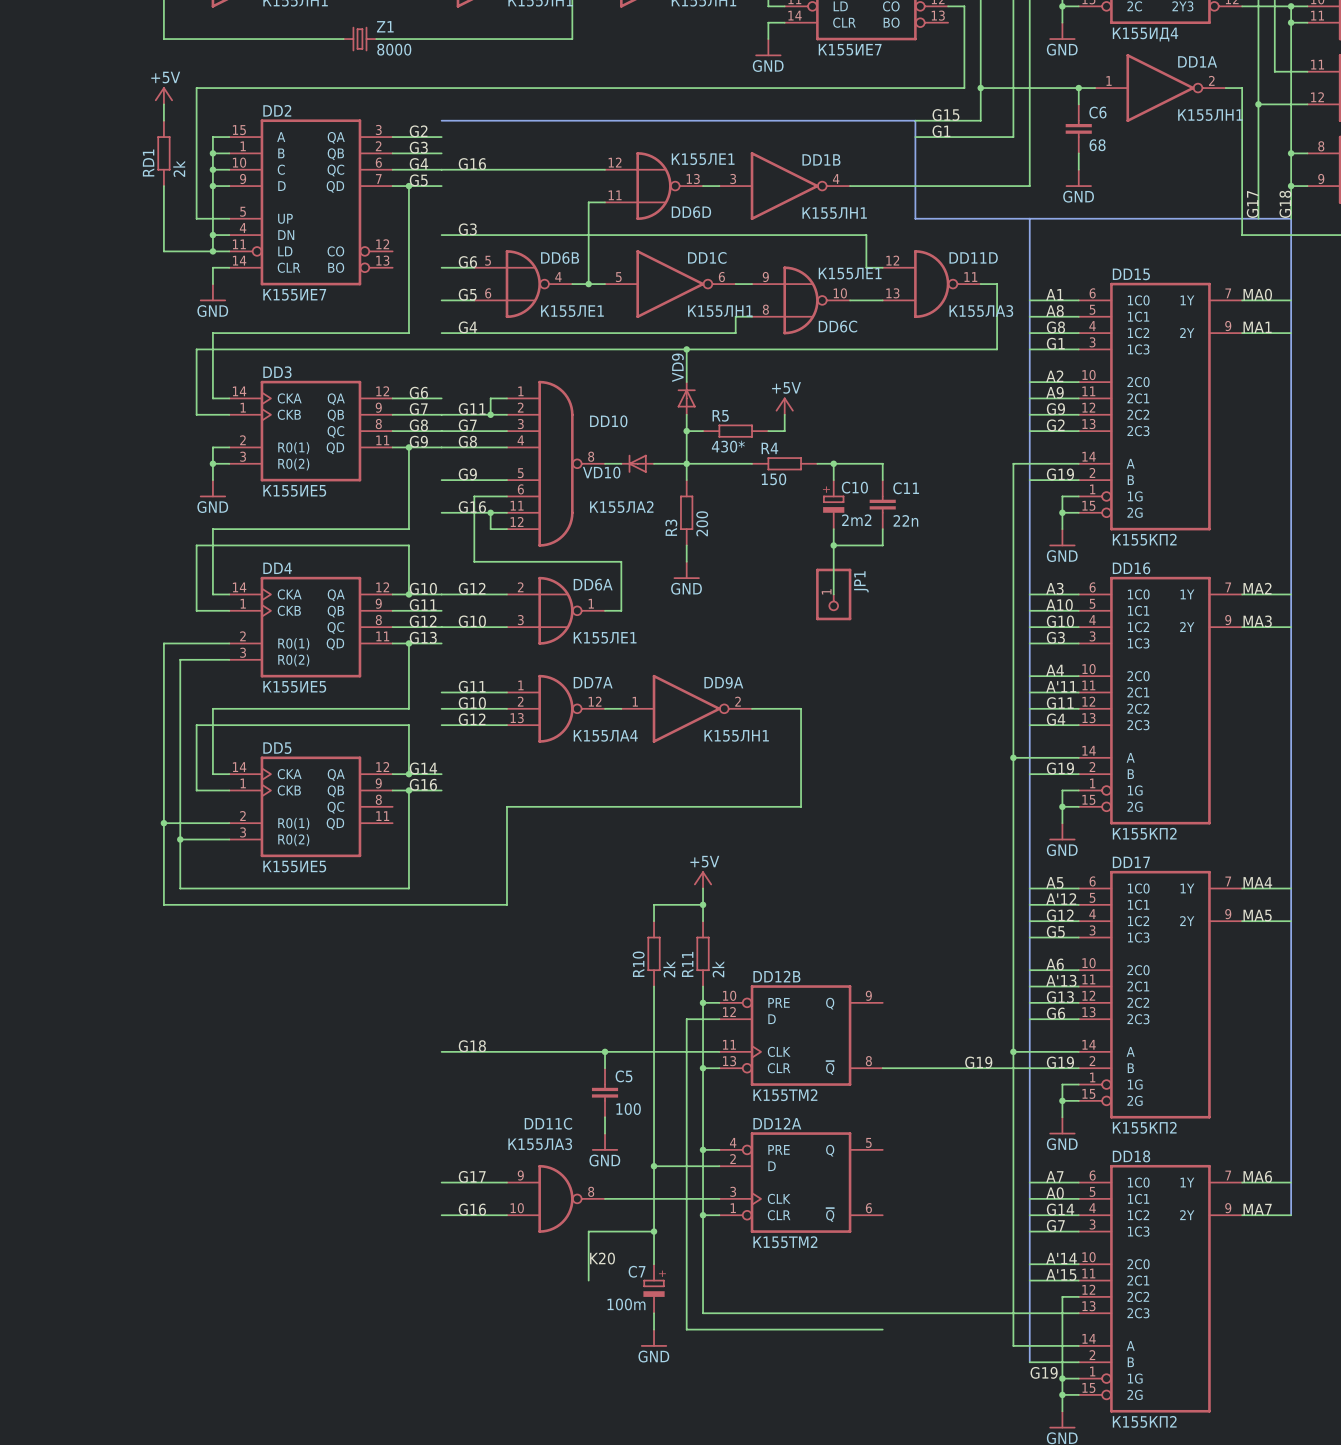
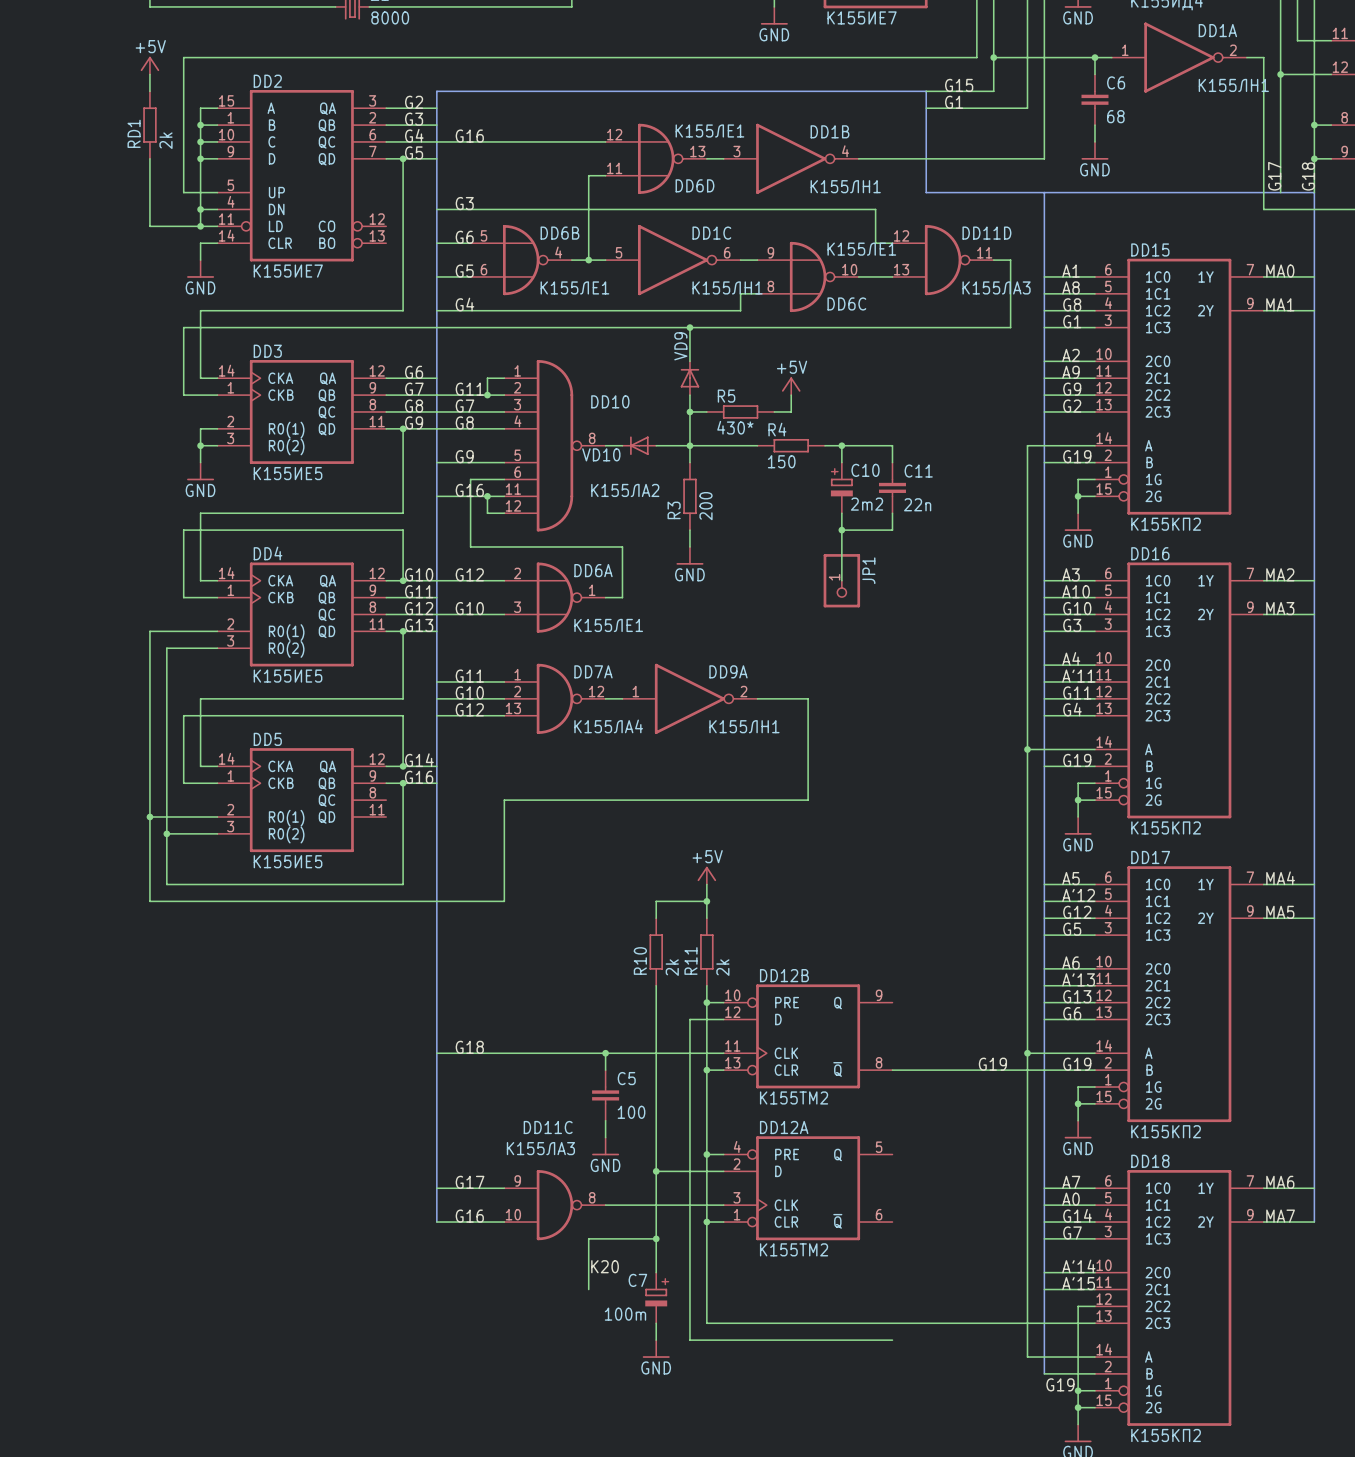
bus: none -> (436, 91) (436, 1222)

